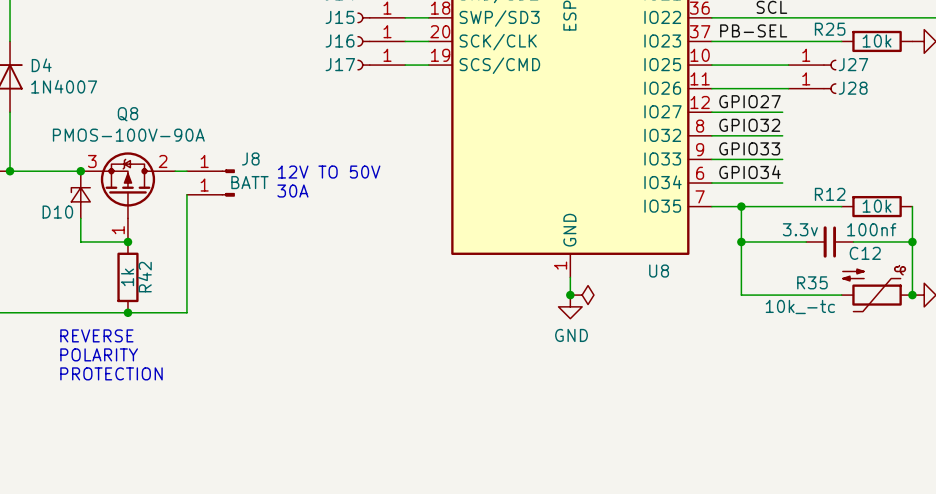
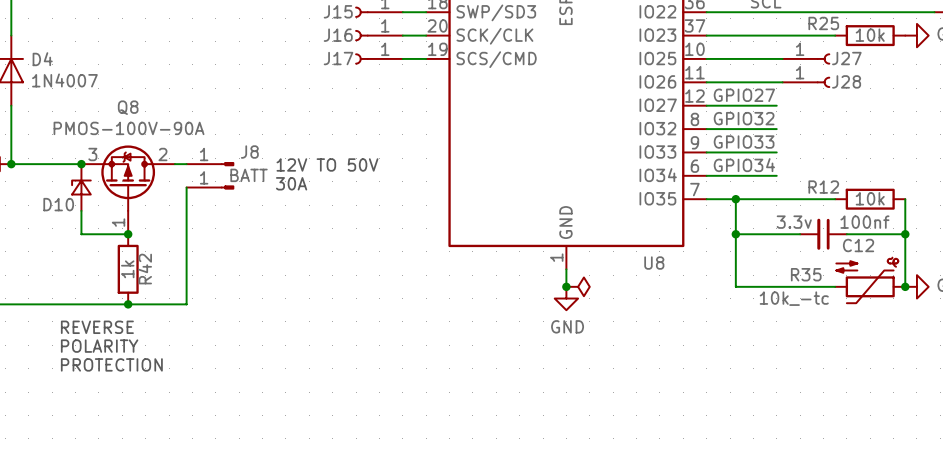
label: PB-SEL (753, 30) -> none

